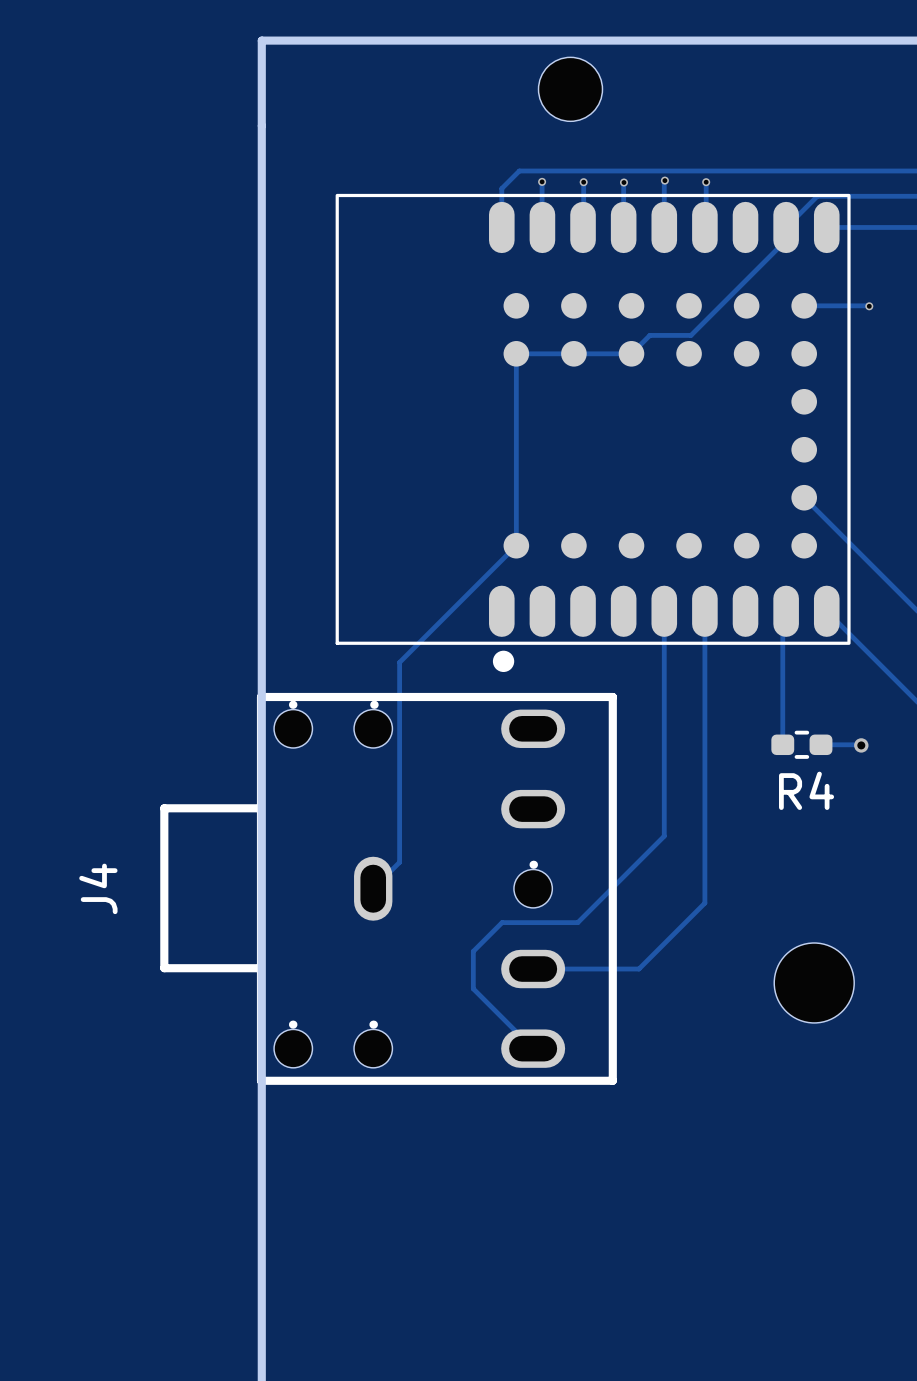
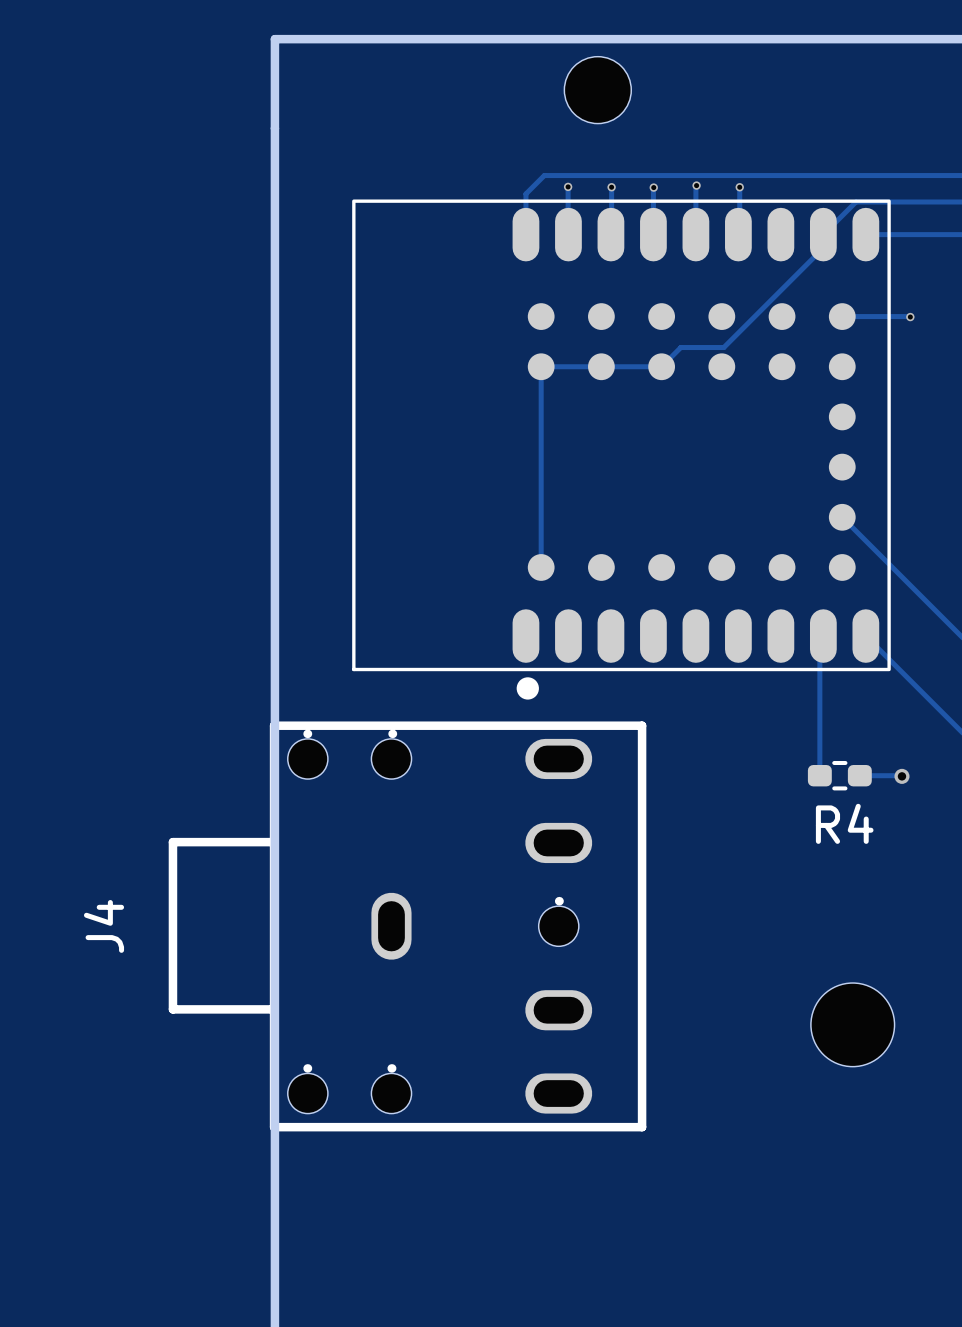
track: (516, 545) (399, 662) (399, 862) (373, 888) -> none
track: (664, 611) (664, 836) (577, 922) (502, 922) (473, 951) (473, 988) (533, 1048) -> none
track: (704, 611) (704, 903) (638, 969) (533, 969) -> none

